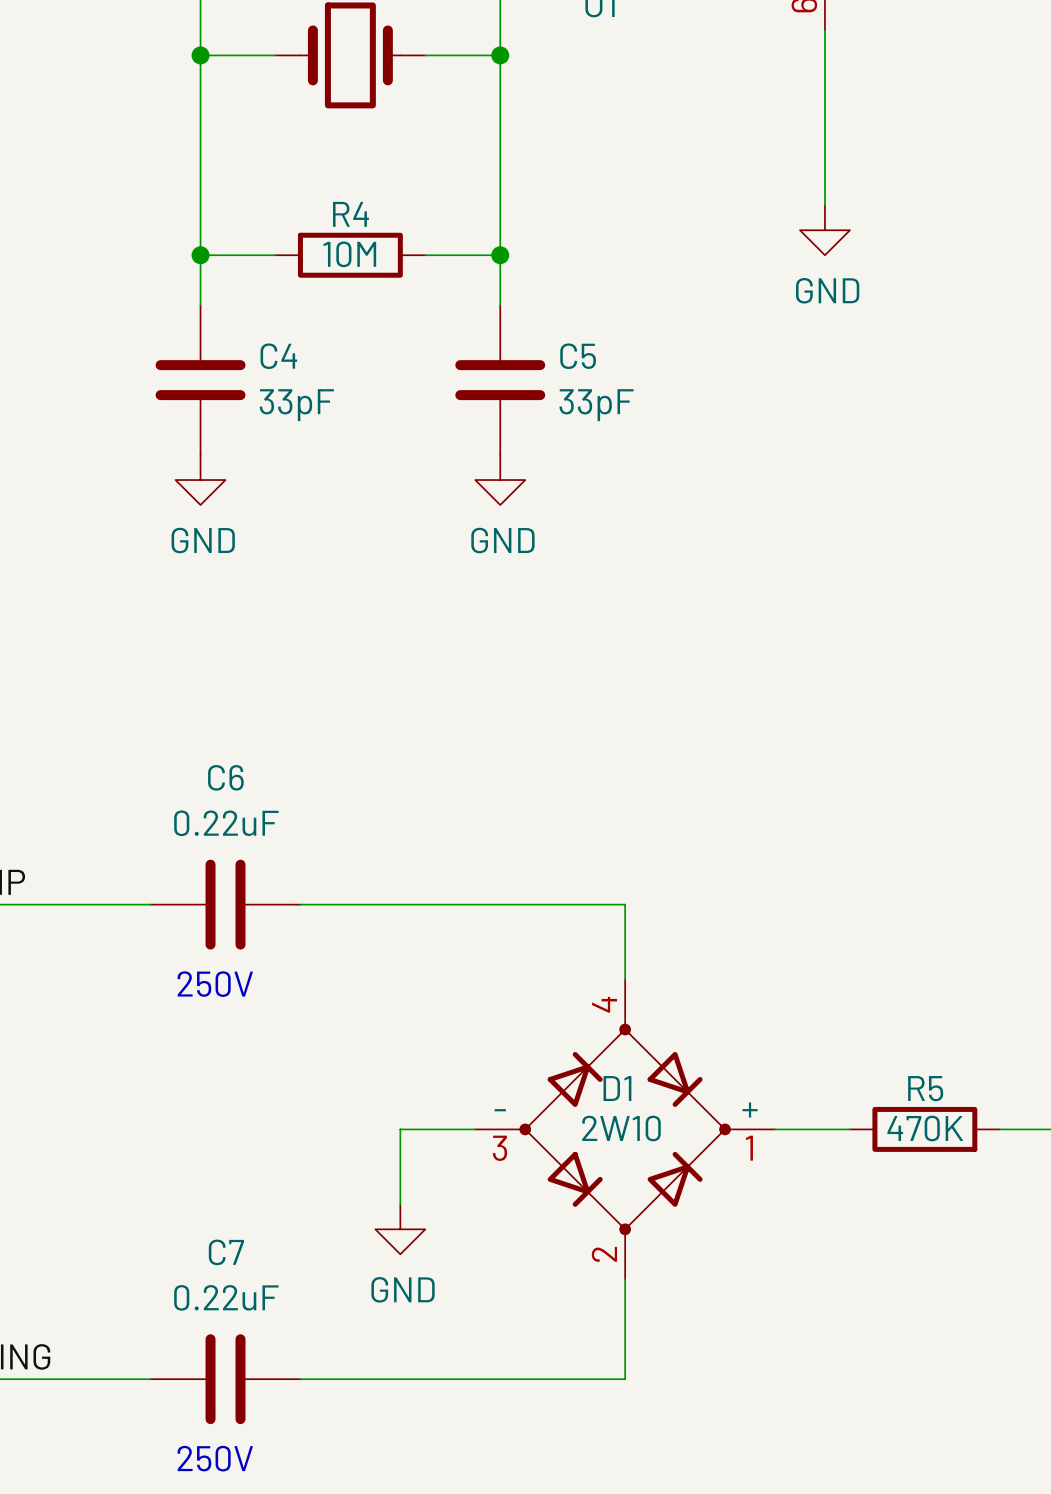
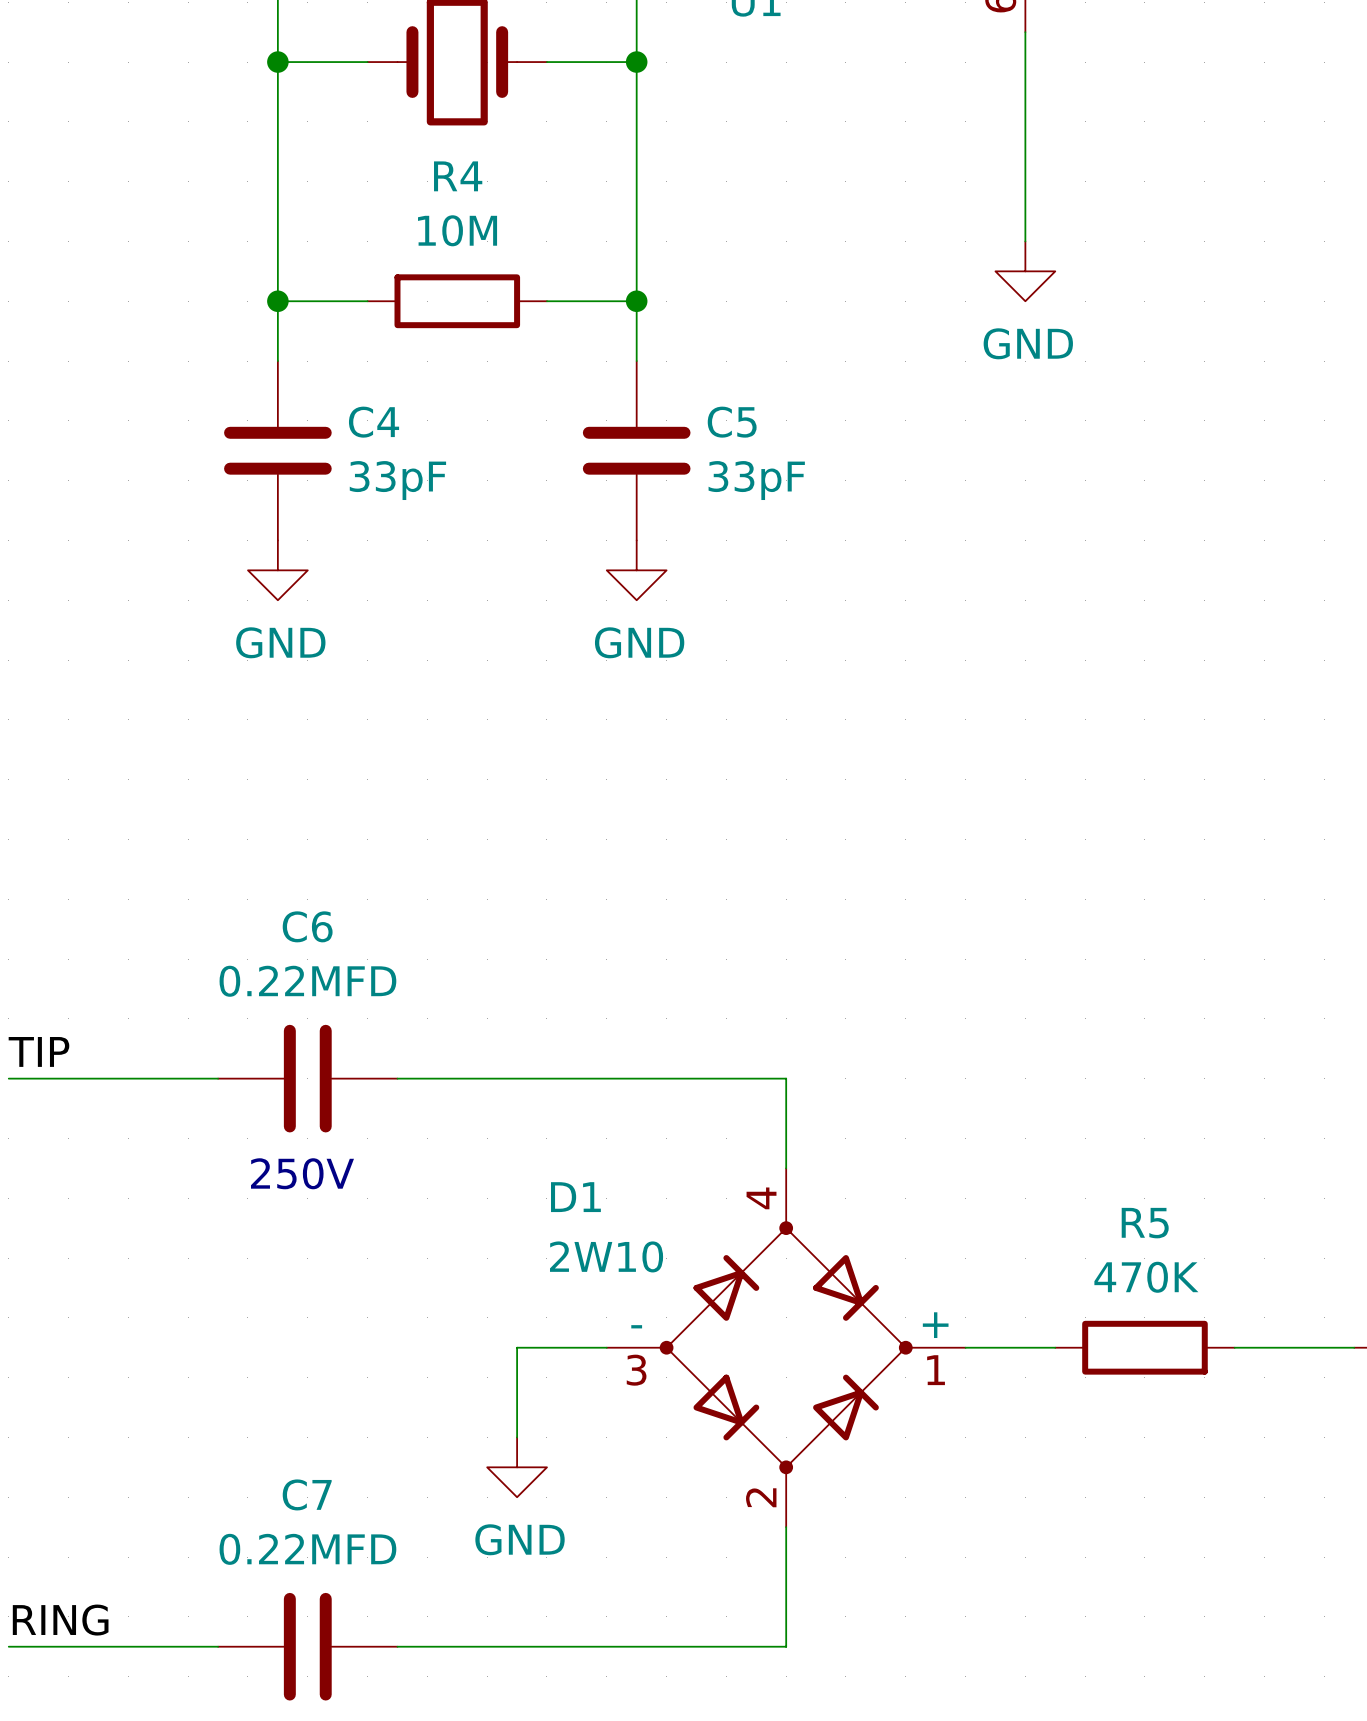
R4 name position: R4 (350, 214) -> R4 (458, 176)
R4 value position: 10M (349, 254) -> 10M (457, 230)
C6 value: 0.22uF (226, 823) -> 0.22MFD (307, 981)
D1 name position: D1 (617, 1088) -> D1 (575, 1197)
R5 name position: R5 (925, 1088) -> R5 (1145, 1223)
D1 value position: 2W10 (621, 1128) -> 2W10 (606, 1256)
R5 value position: 470K (925, 1128) -> 470K (1146, 1277)
C7 value: 0.22uF (226, 1297) -> 0.22MFD (307, 1549)

